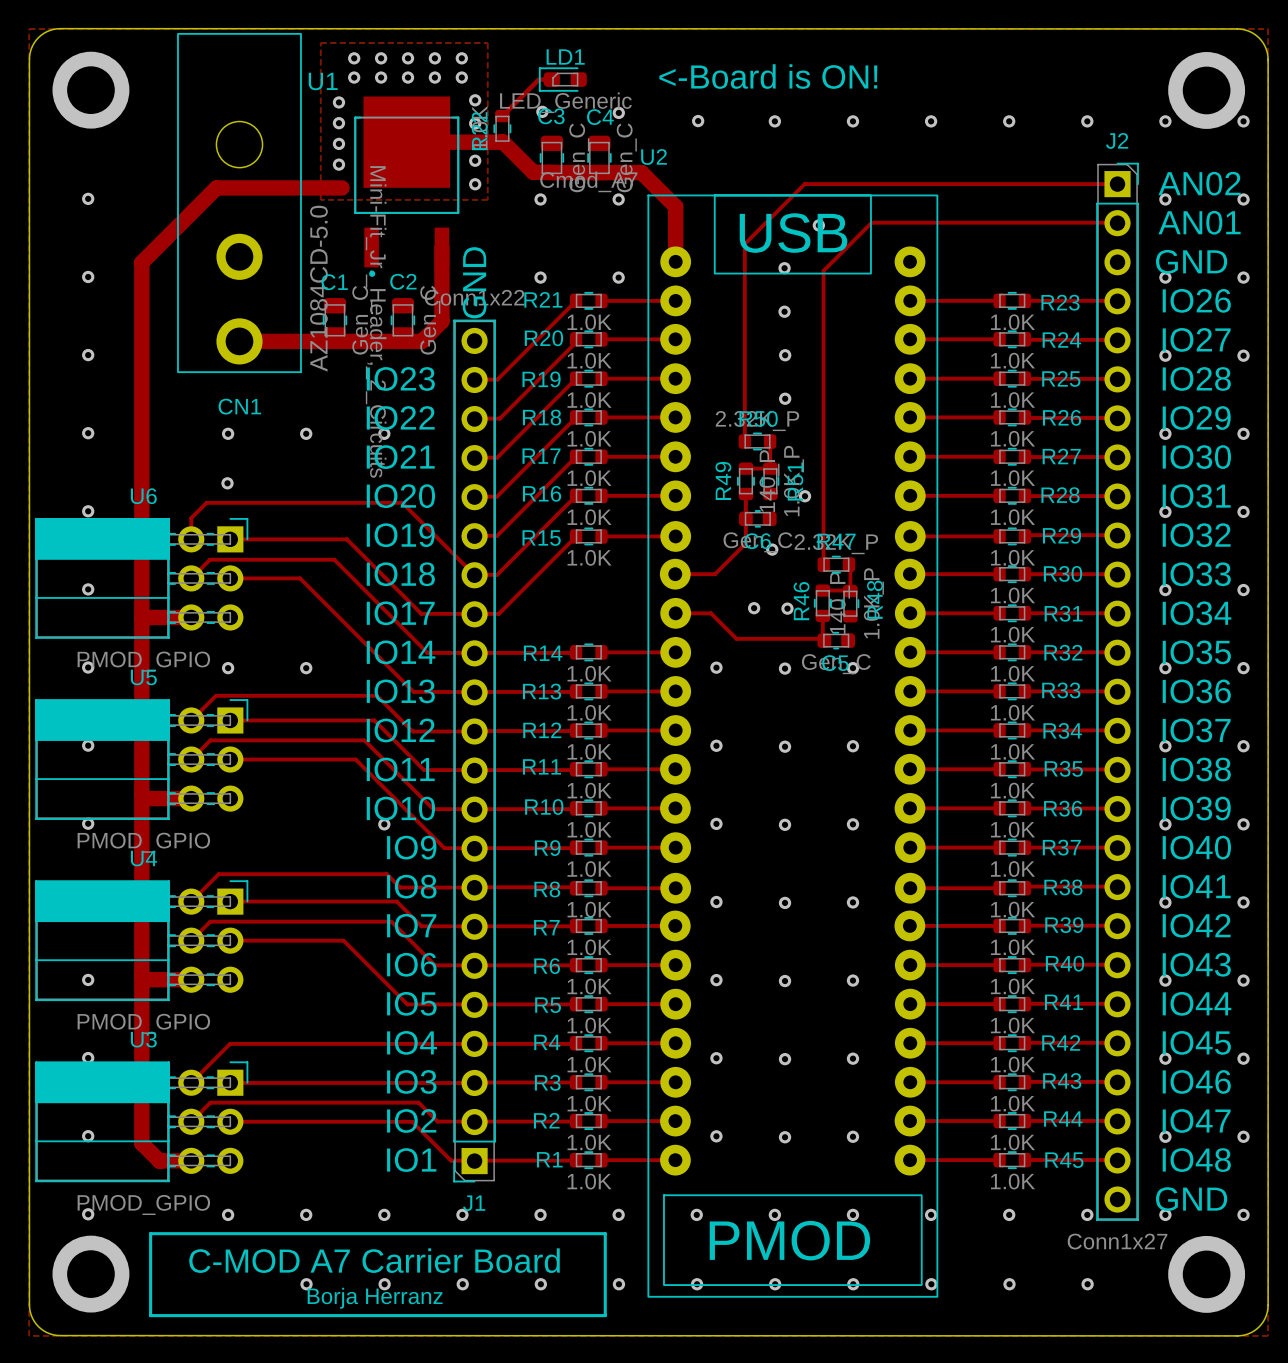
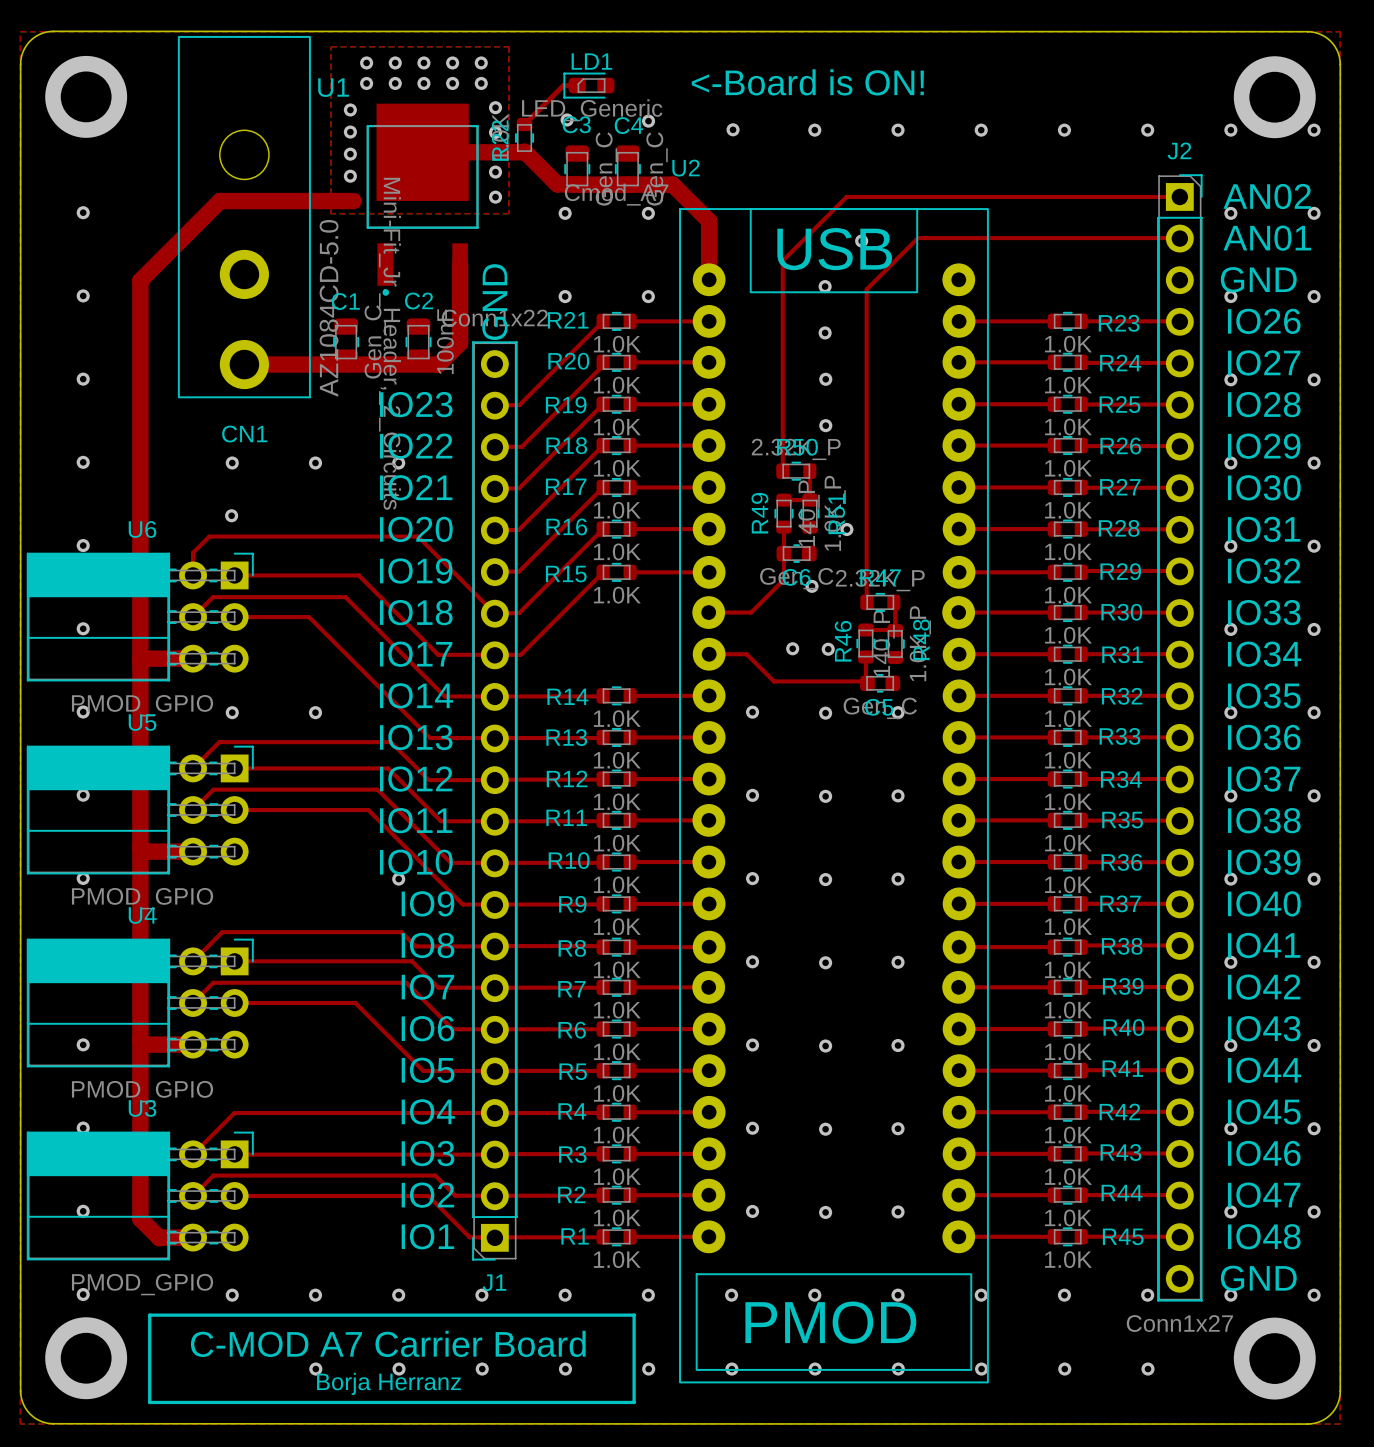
C2 value: Gen_C (430, 320) -> 100nF (445, 341)

